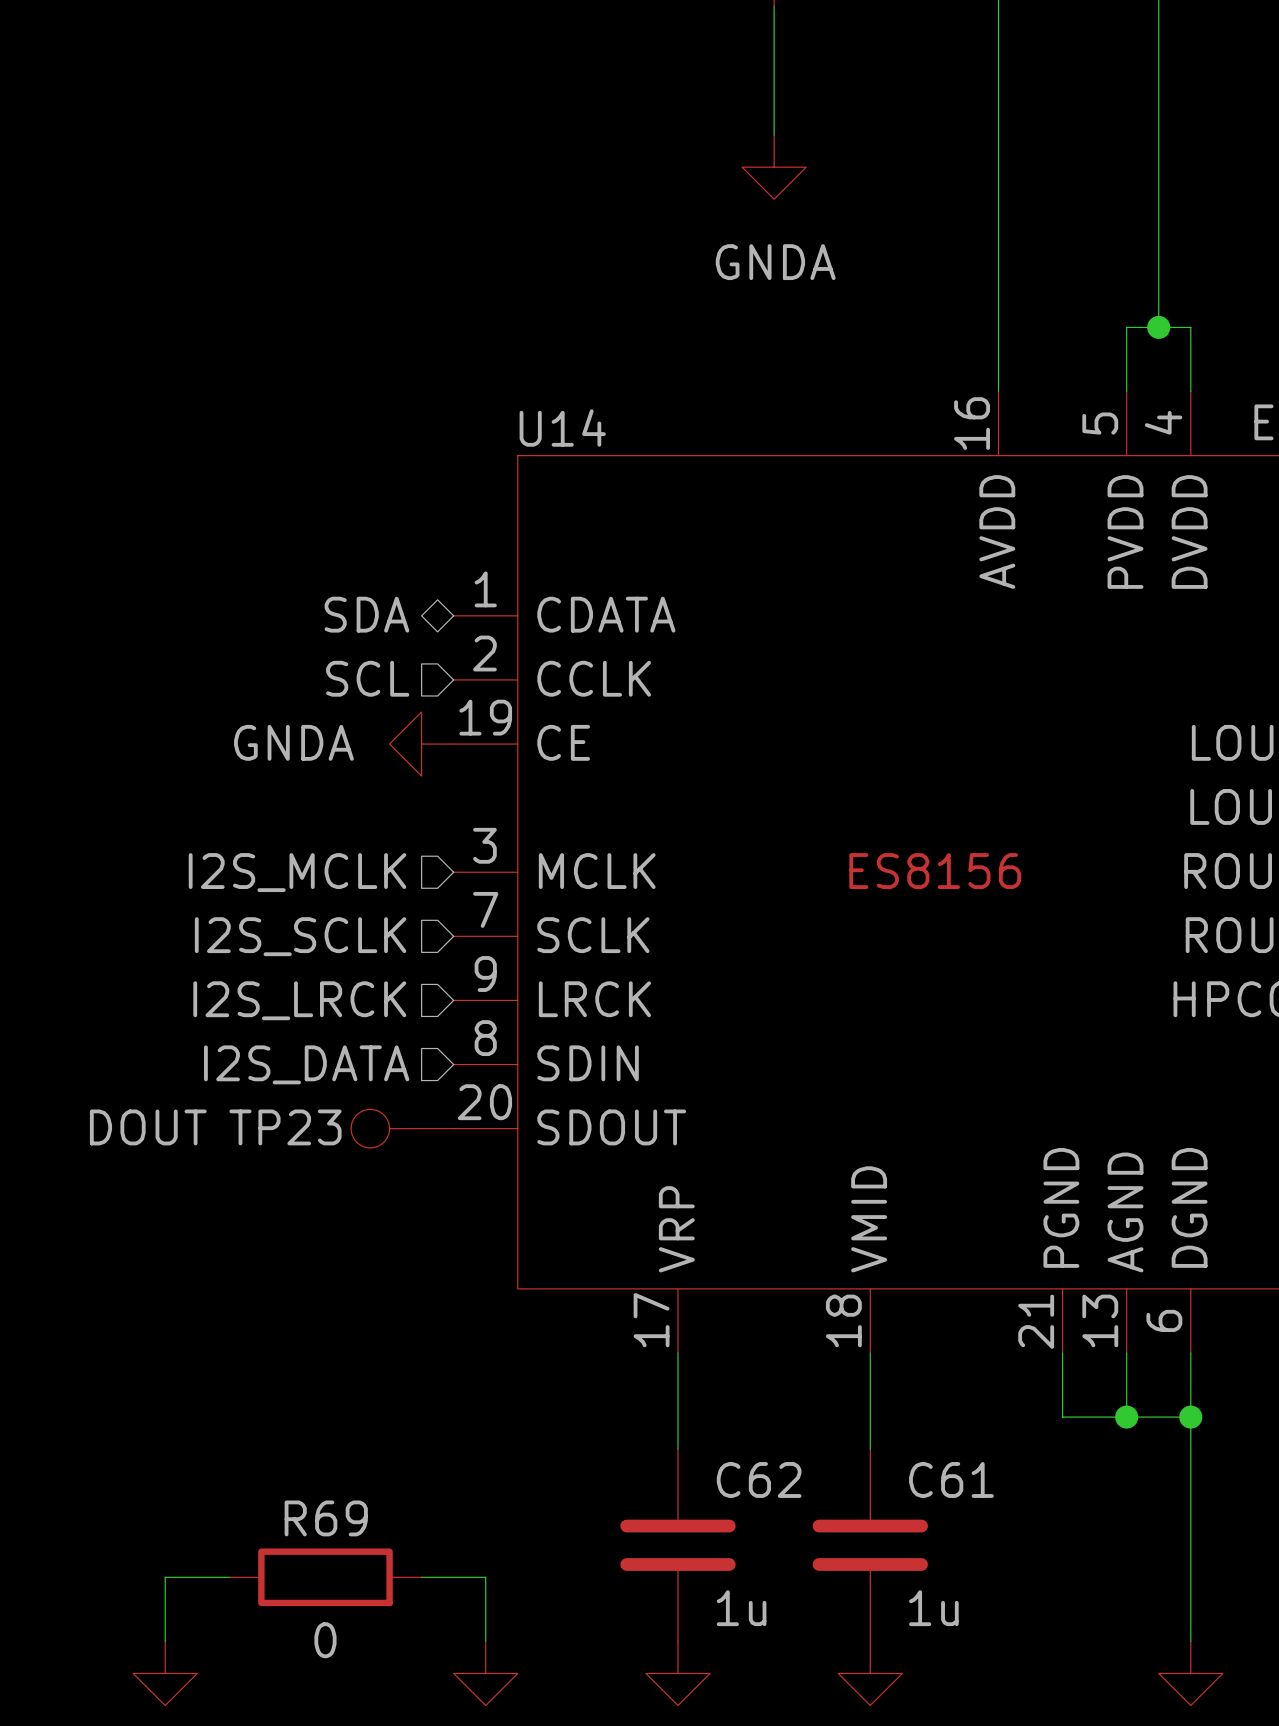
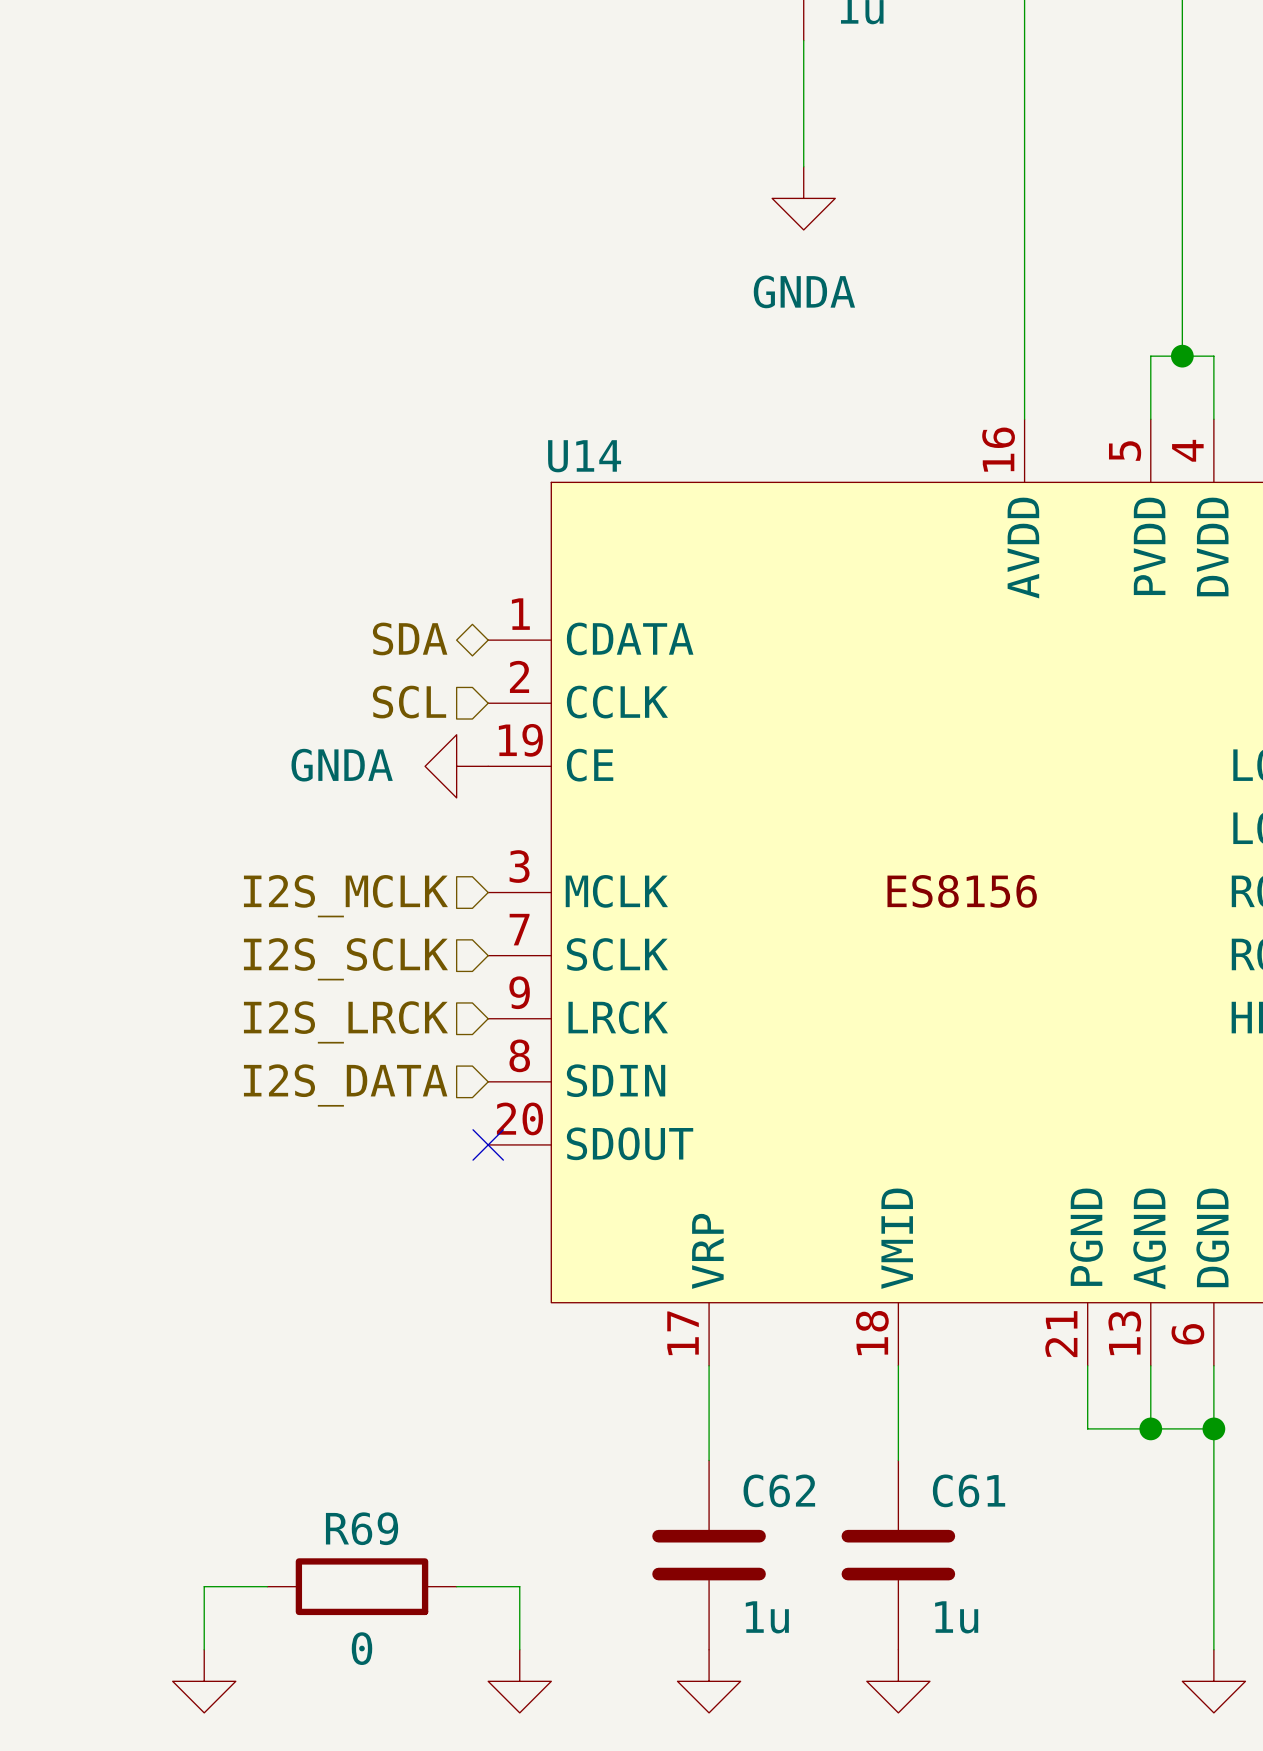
TP23: DOUT (402, 1128) -> none
no-connect mark: none -> (488, 1144)

